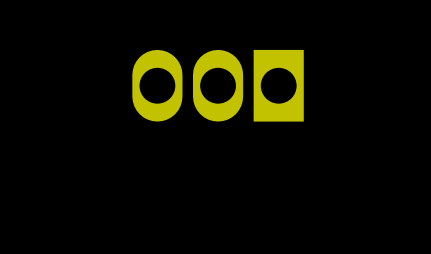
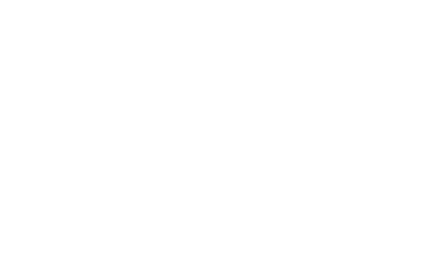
part: (218, 85) -> none

